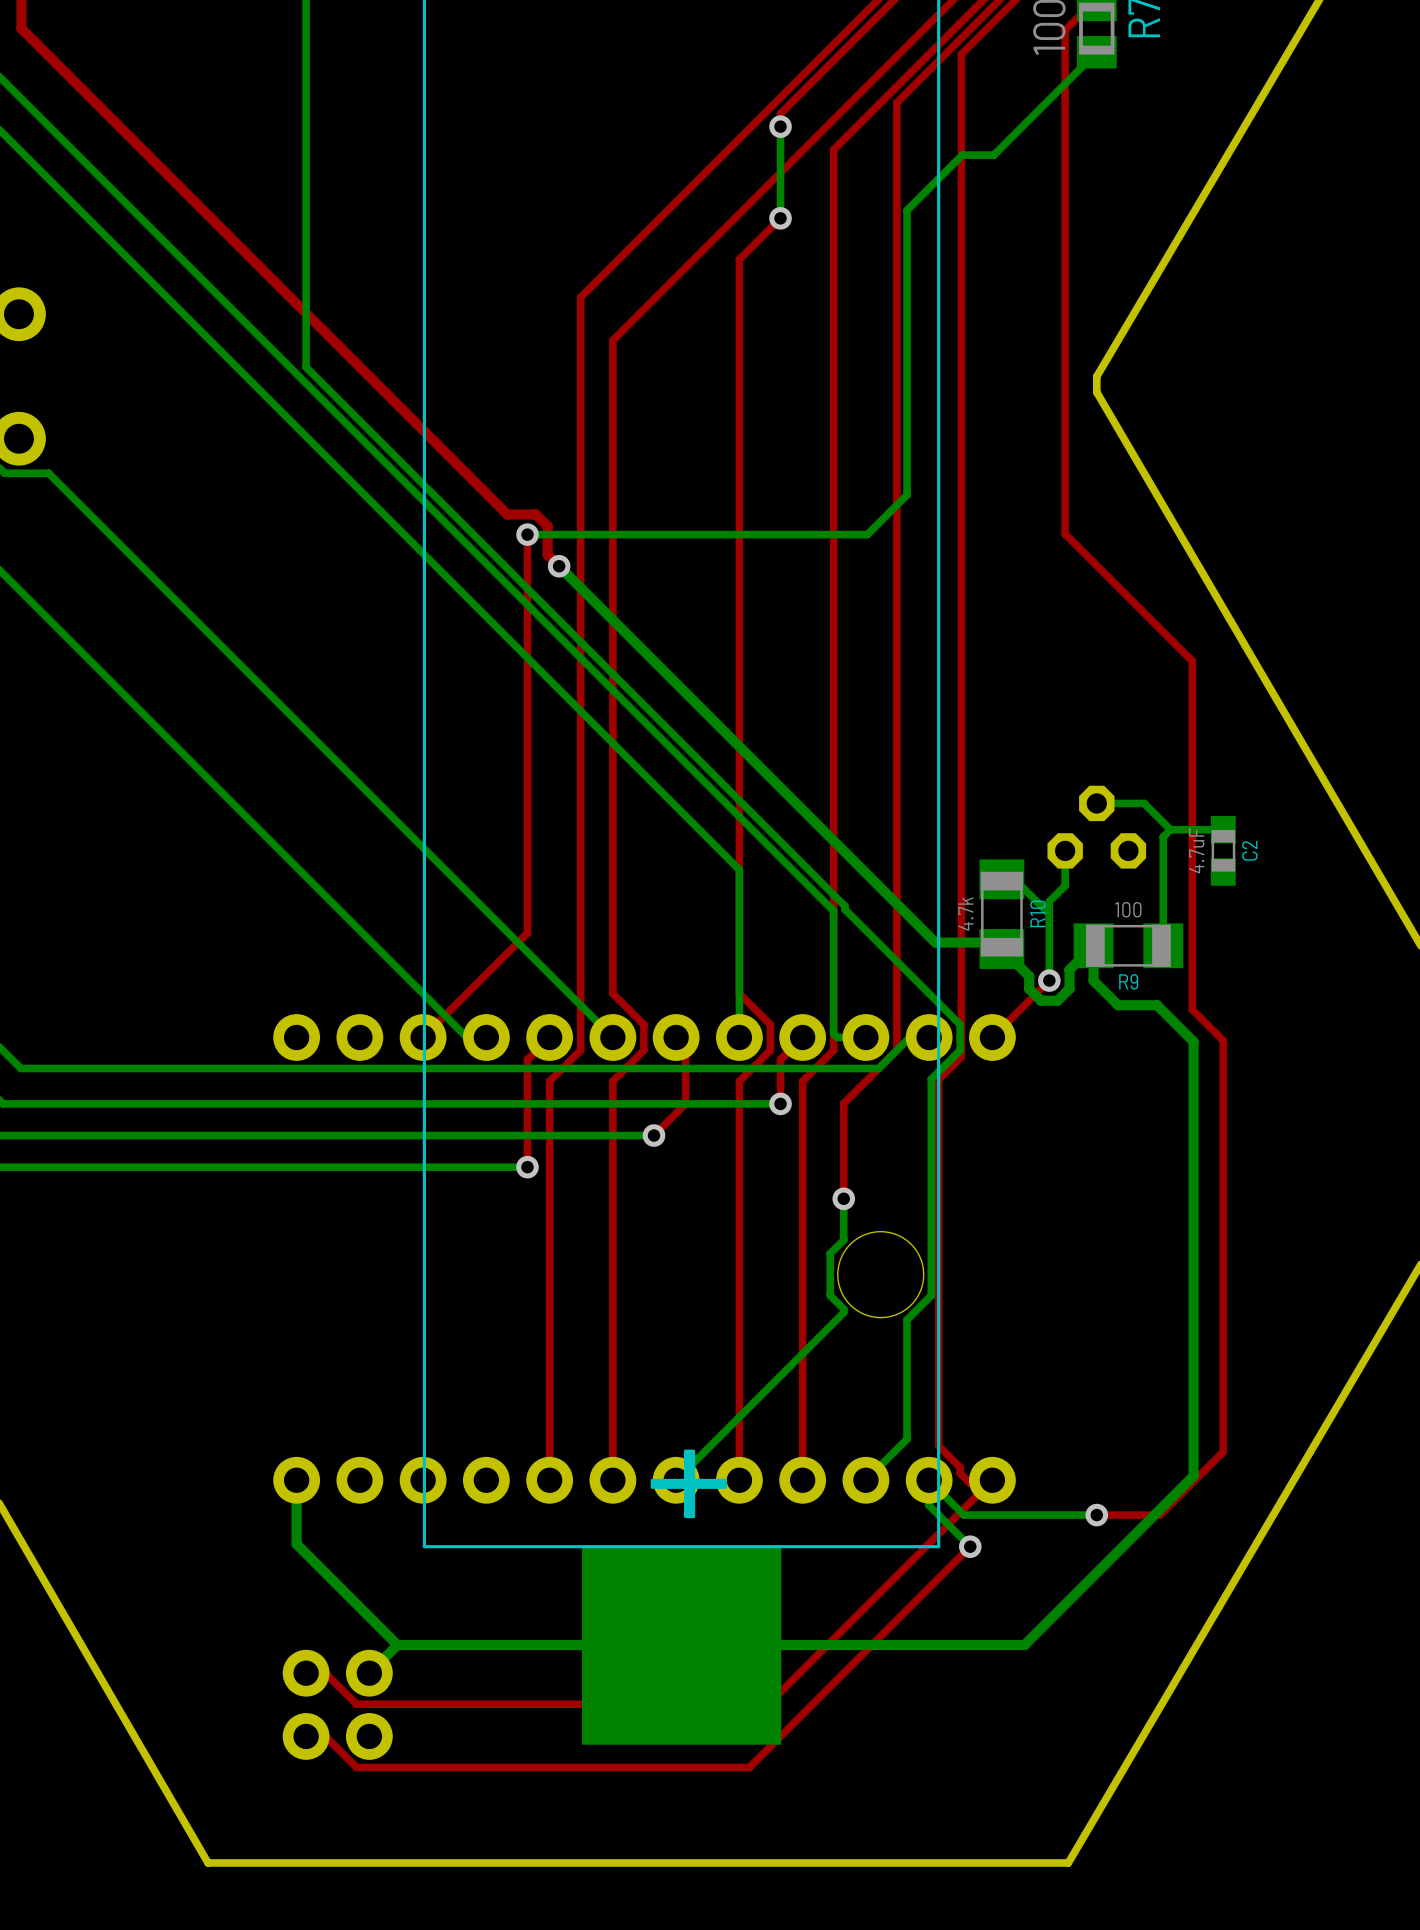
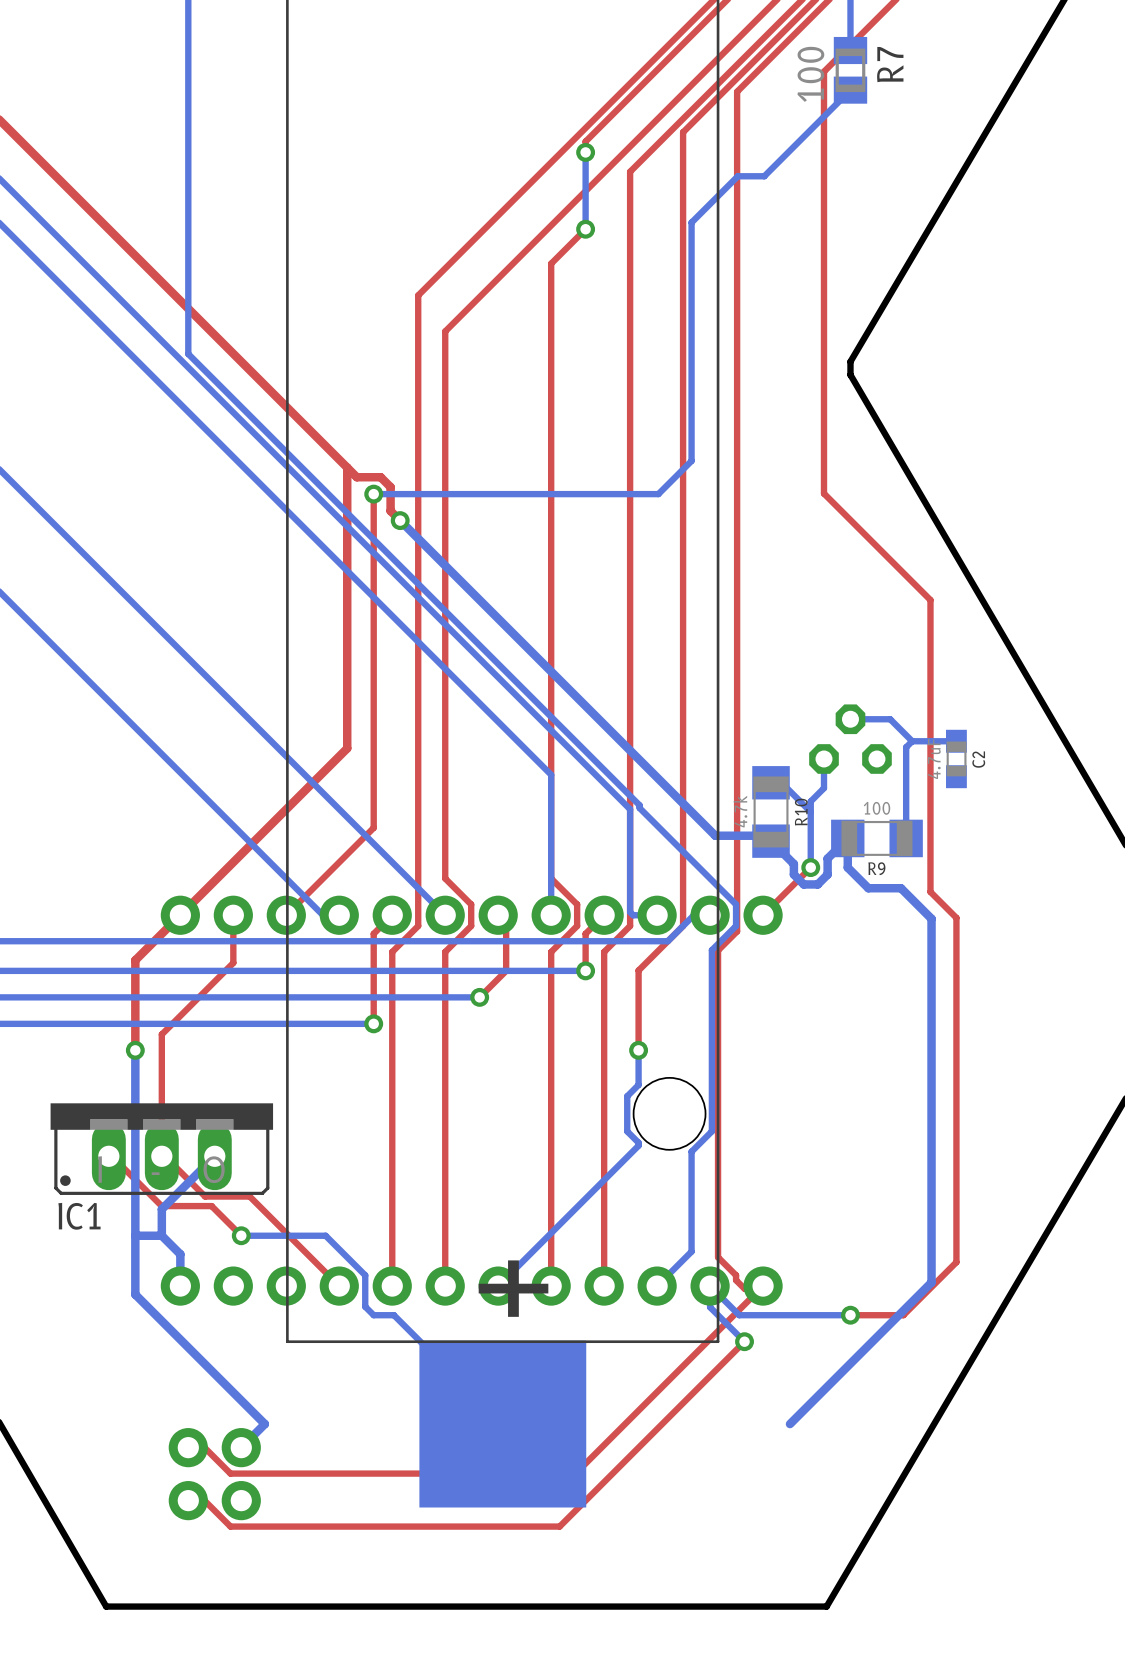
top track: none -> (347, 467) (347, 748) (135, 960) (135, 1050)
top track: none -> (233, 915) (233, 962) (161, 1034) (161, 1156) (164, 1156) (205, 1196) (249, 1196) (339, 1286)
bottom track: none -> (135, 1050) (135, 1294) (180, 1339)
via: none -> (135, 1050)
IC1: none -> (161, 1149)
top track: none -> (108, 1156) (111, 1156) (161, 1206) (211, 1206) (241, 1235)
bottom track: none -> (214, 1156) (161, 1209) (161, 1235)
bottom track: none -> (161, 1235) (135, 1235)
bottom track: none -> (241, 1235) (325, 1235) (365, 1275) (365, 1306) (373, 1315) (393, 1315) (502, 1424)
via: none -> (241, 1235)
bottom track: (296, 1480) (296, 1544) -> (180, 1286) (180, 1254) (161, 1235)
bottom track: (1024, 1645) (397, 1645) -> none

